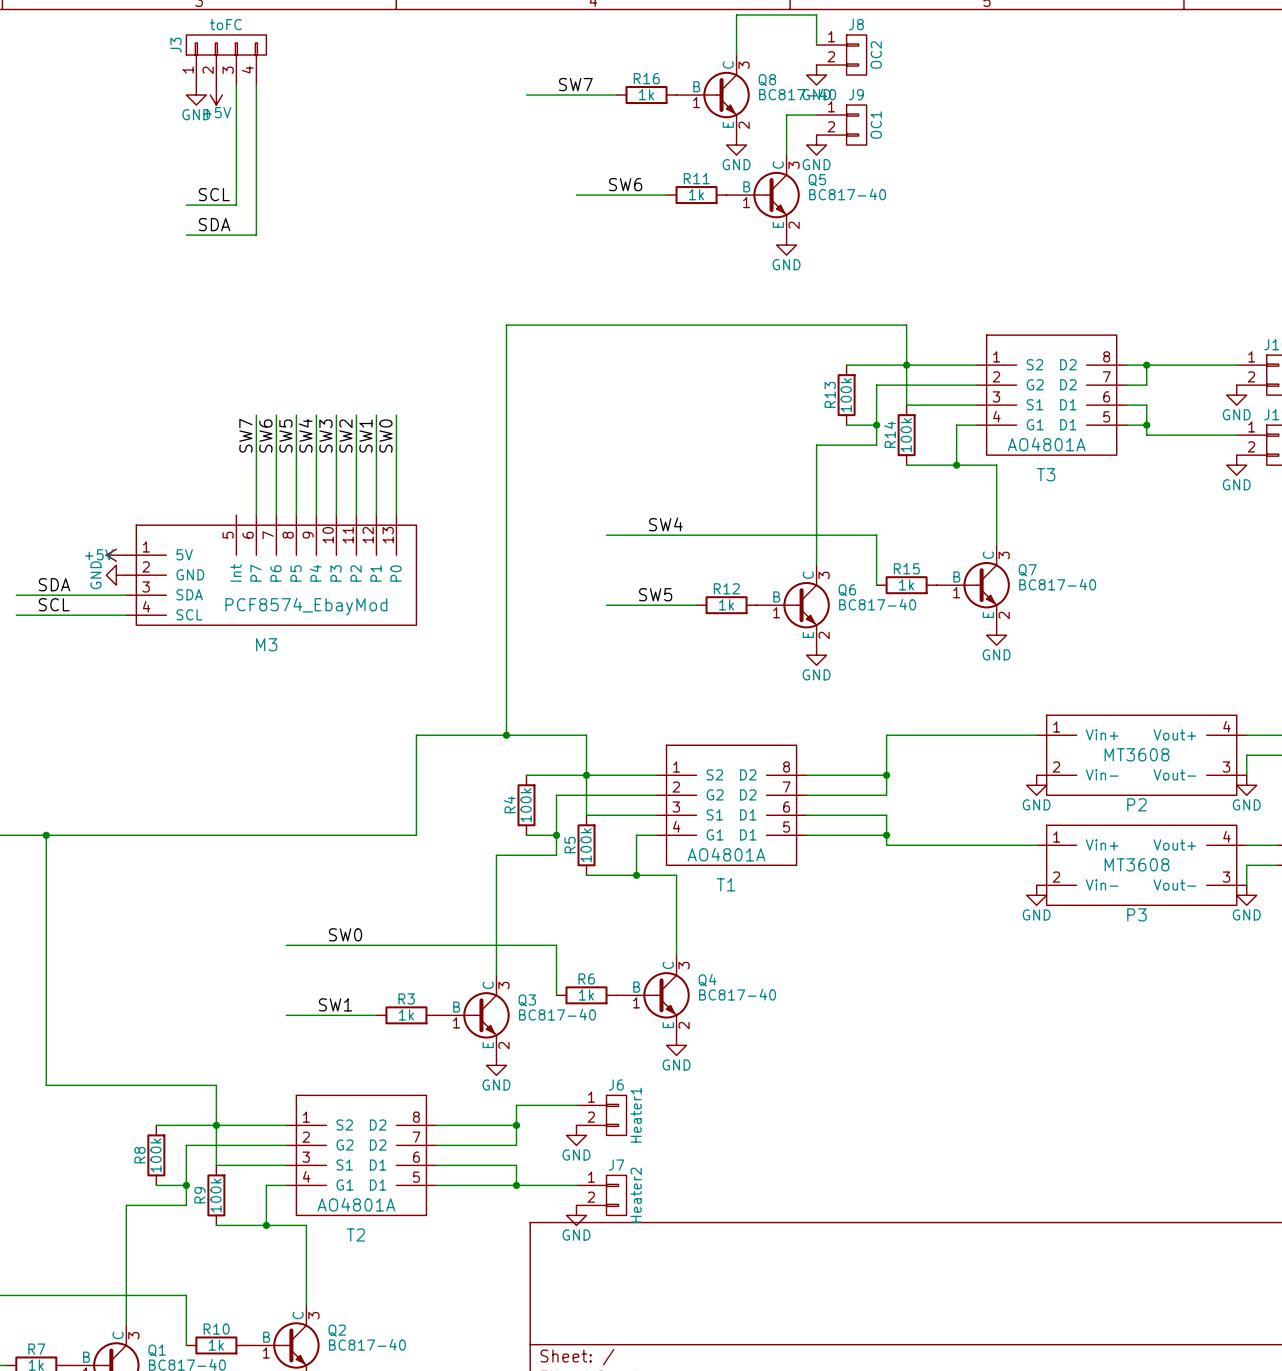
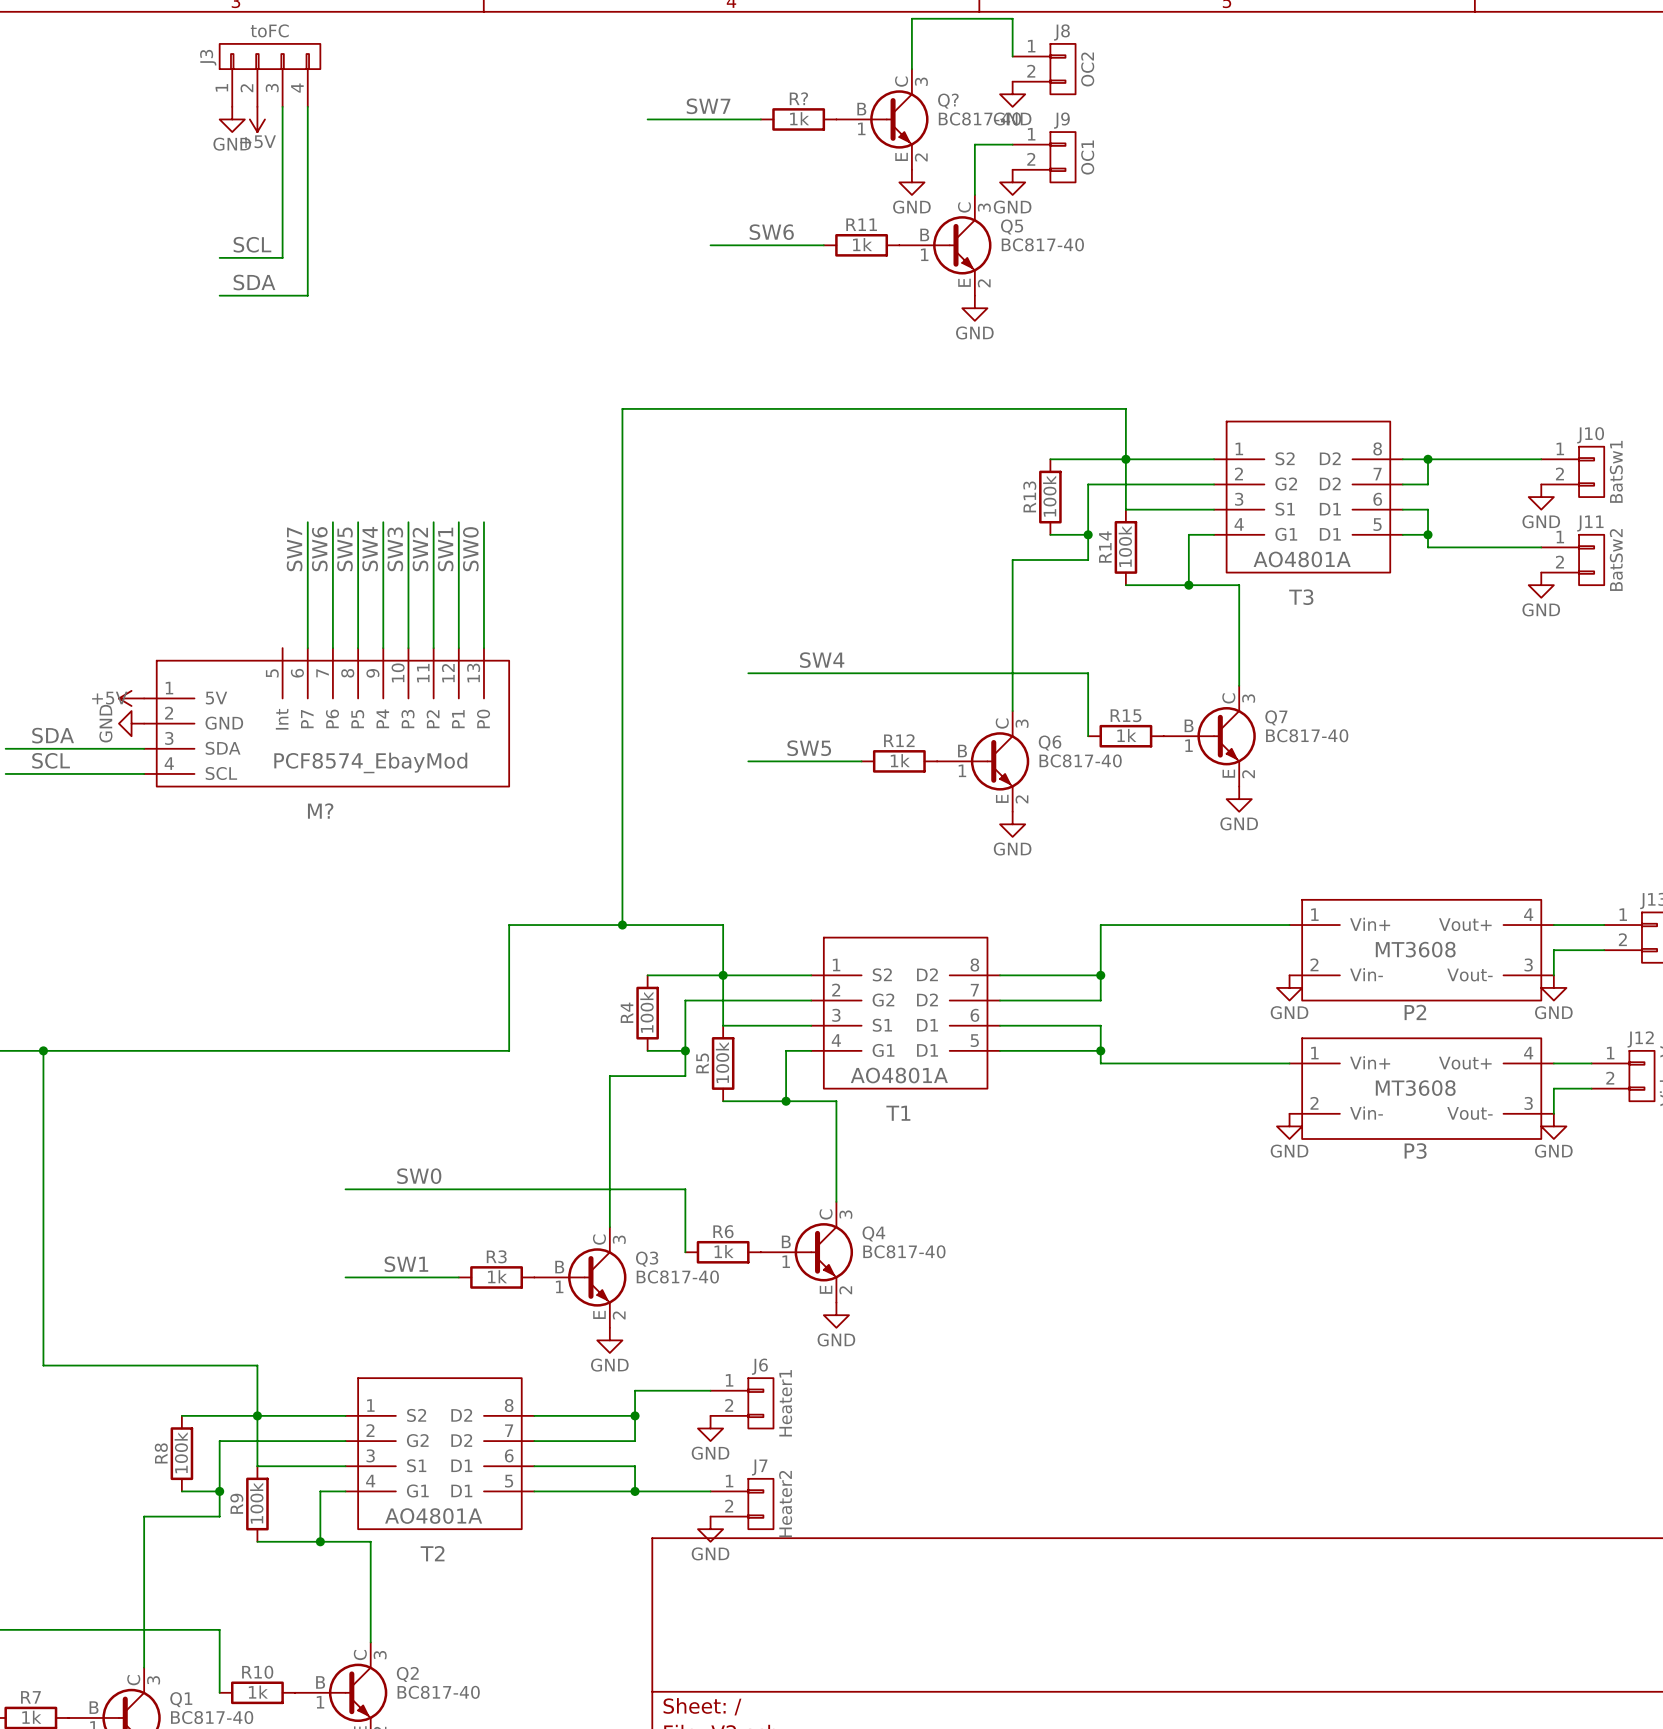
R16 name: R16 (646, 78) -> R? (798, 98)
Q8 name: Q8 (767, 80) -> Q? (948, 101)
M3 name: M3 (266, 644) -> M? (320, 811)

